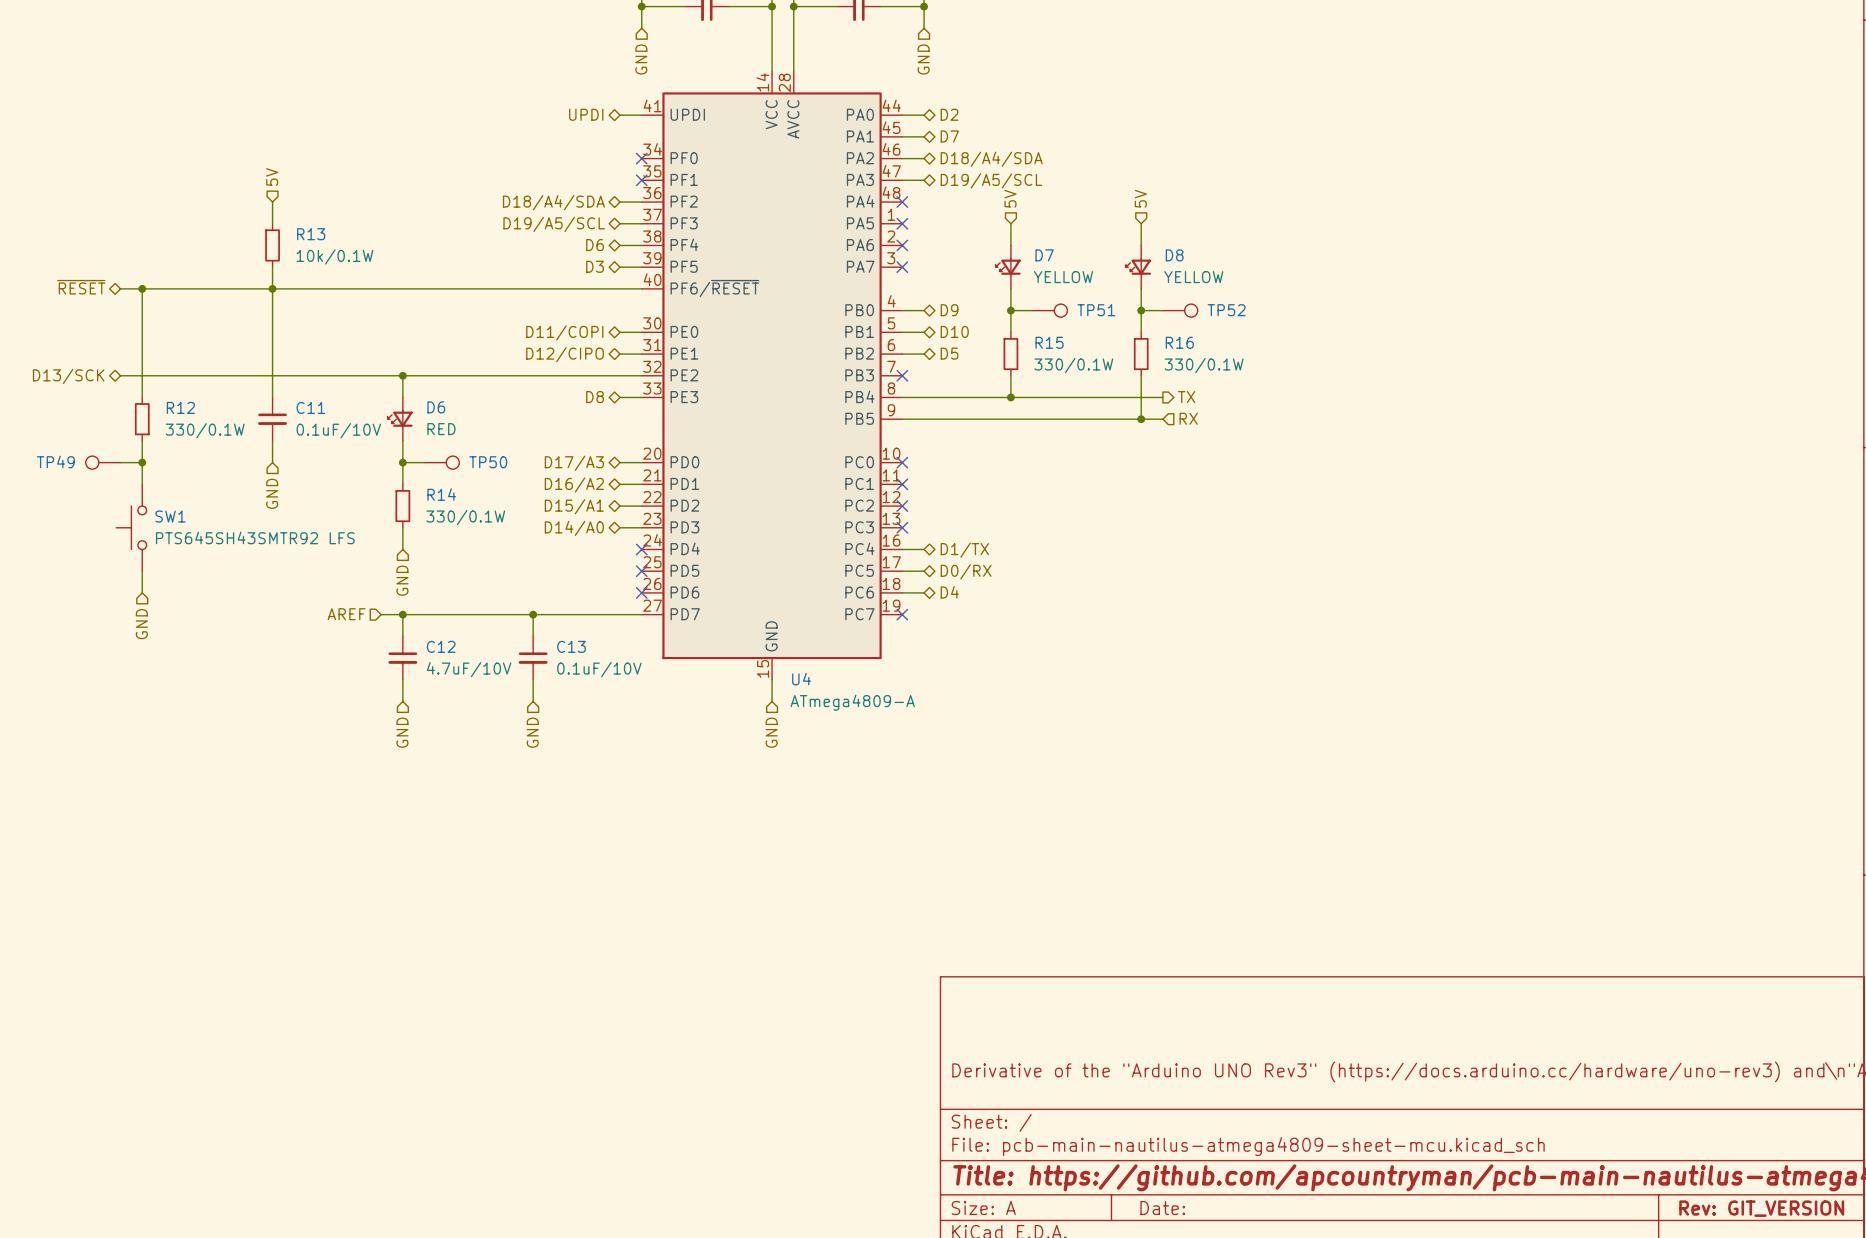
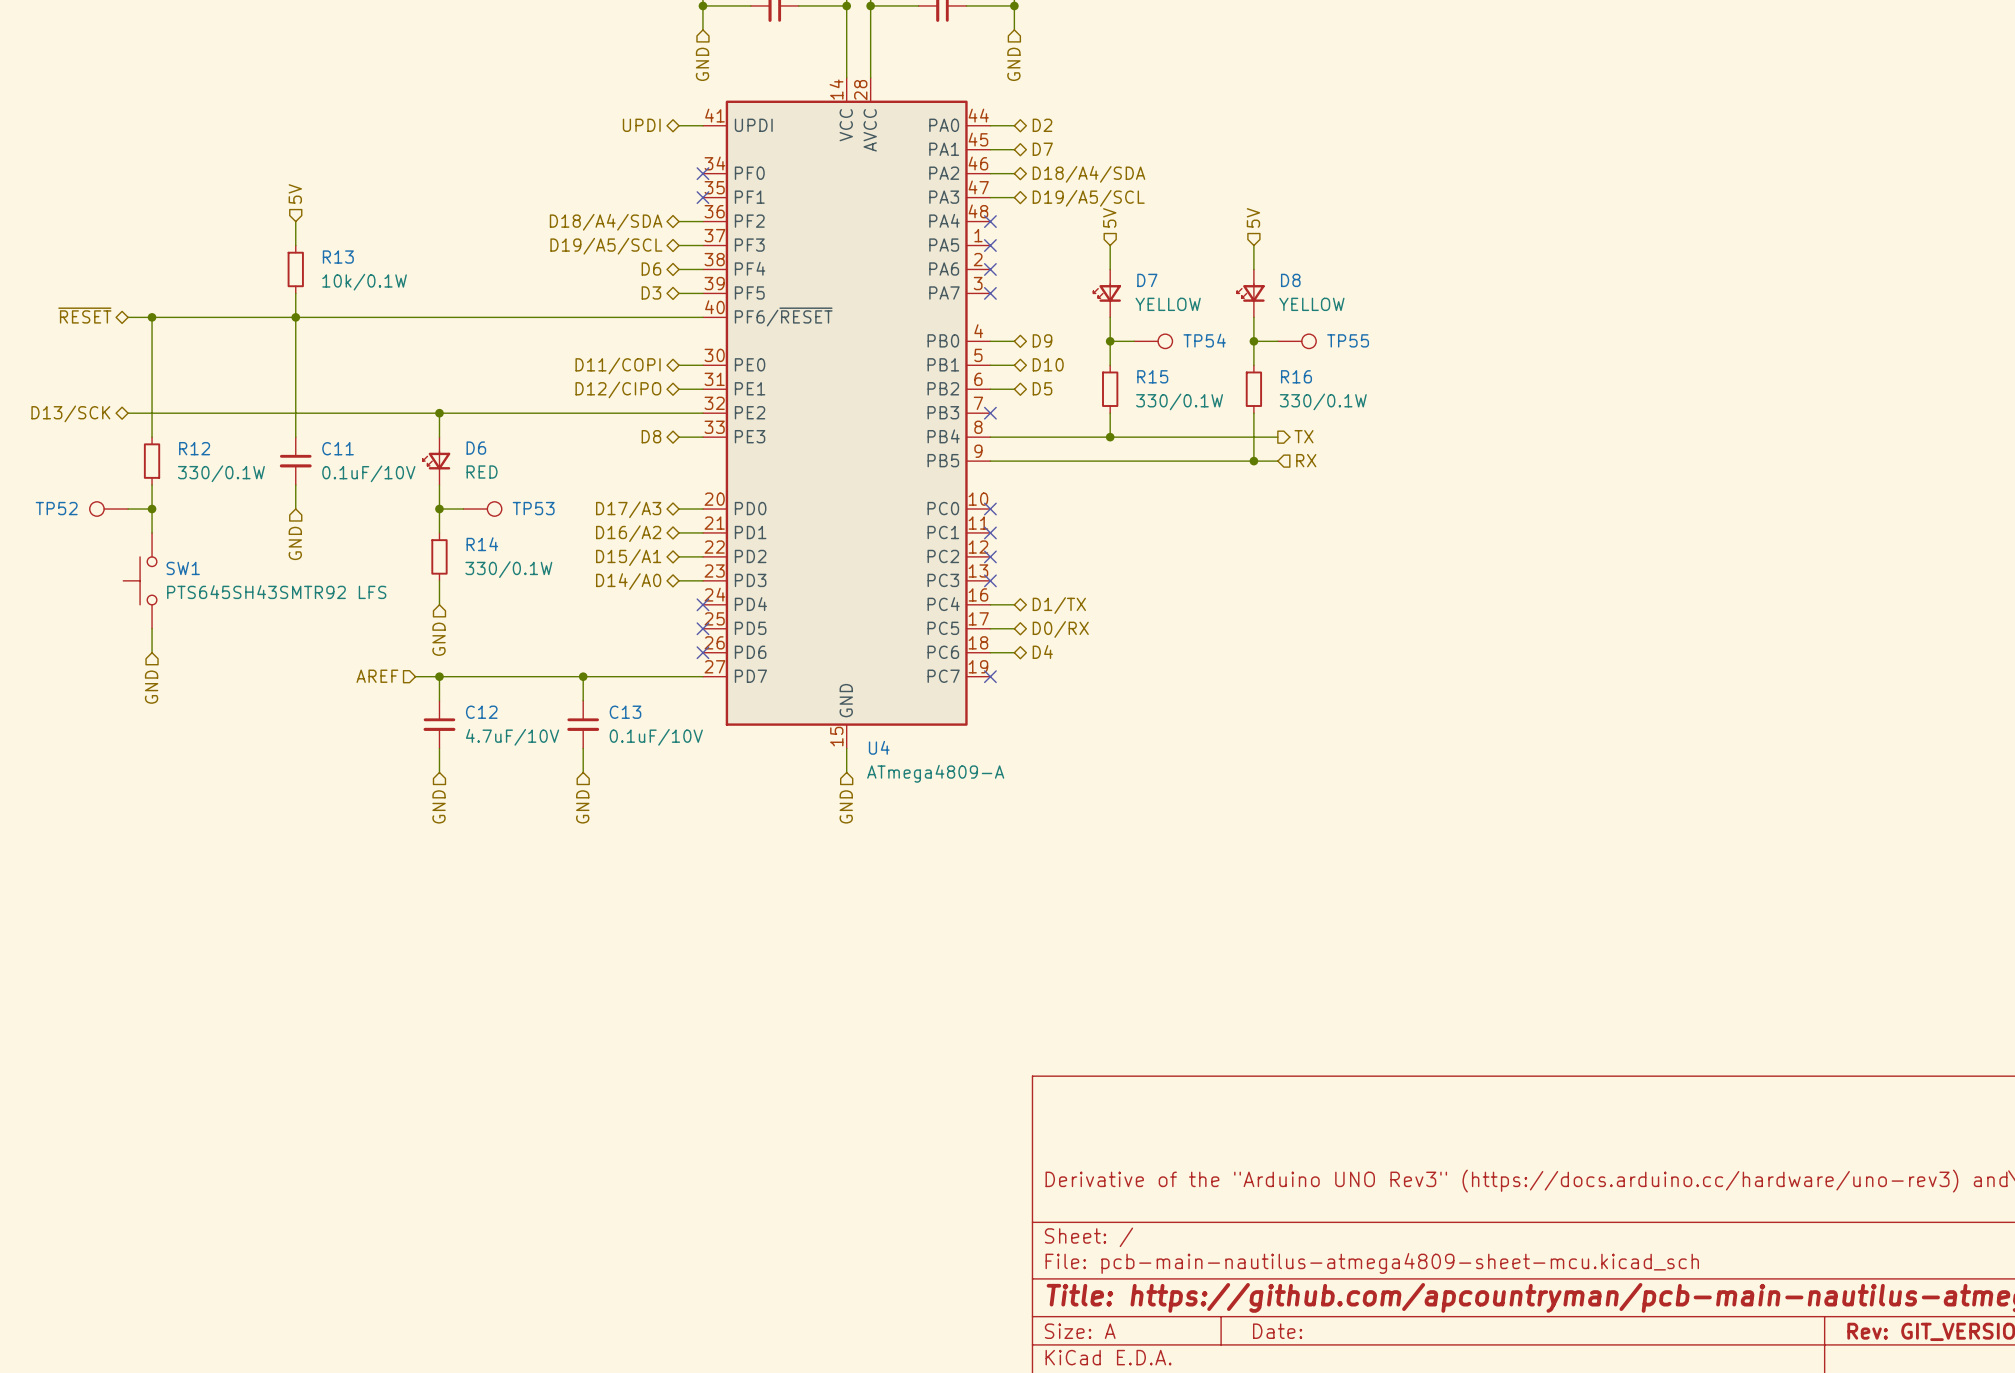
TP51 name: TP51 (1096, 310) -> TP54 (1204, 340)
TP52 name: TP52 (1226, 310) -> TP55 (1348, 340)
TP49 name: TP49 (55, 461) -> TP52 (56, 508)
TP50 name: TP50 (488, 462) -> TP53 (533, 508)

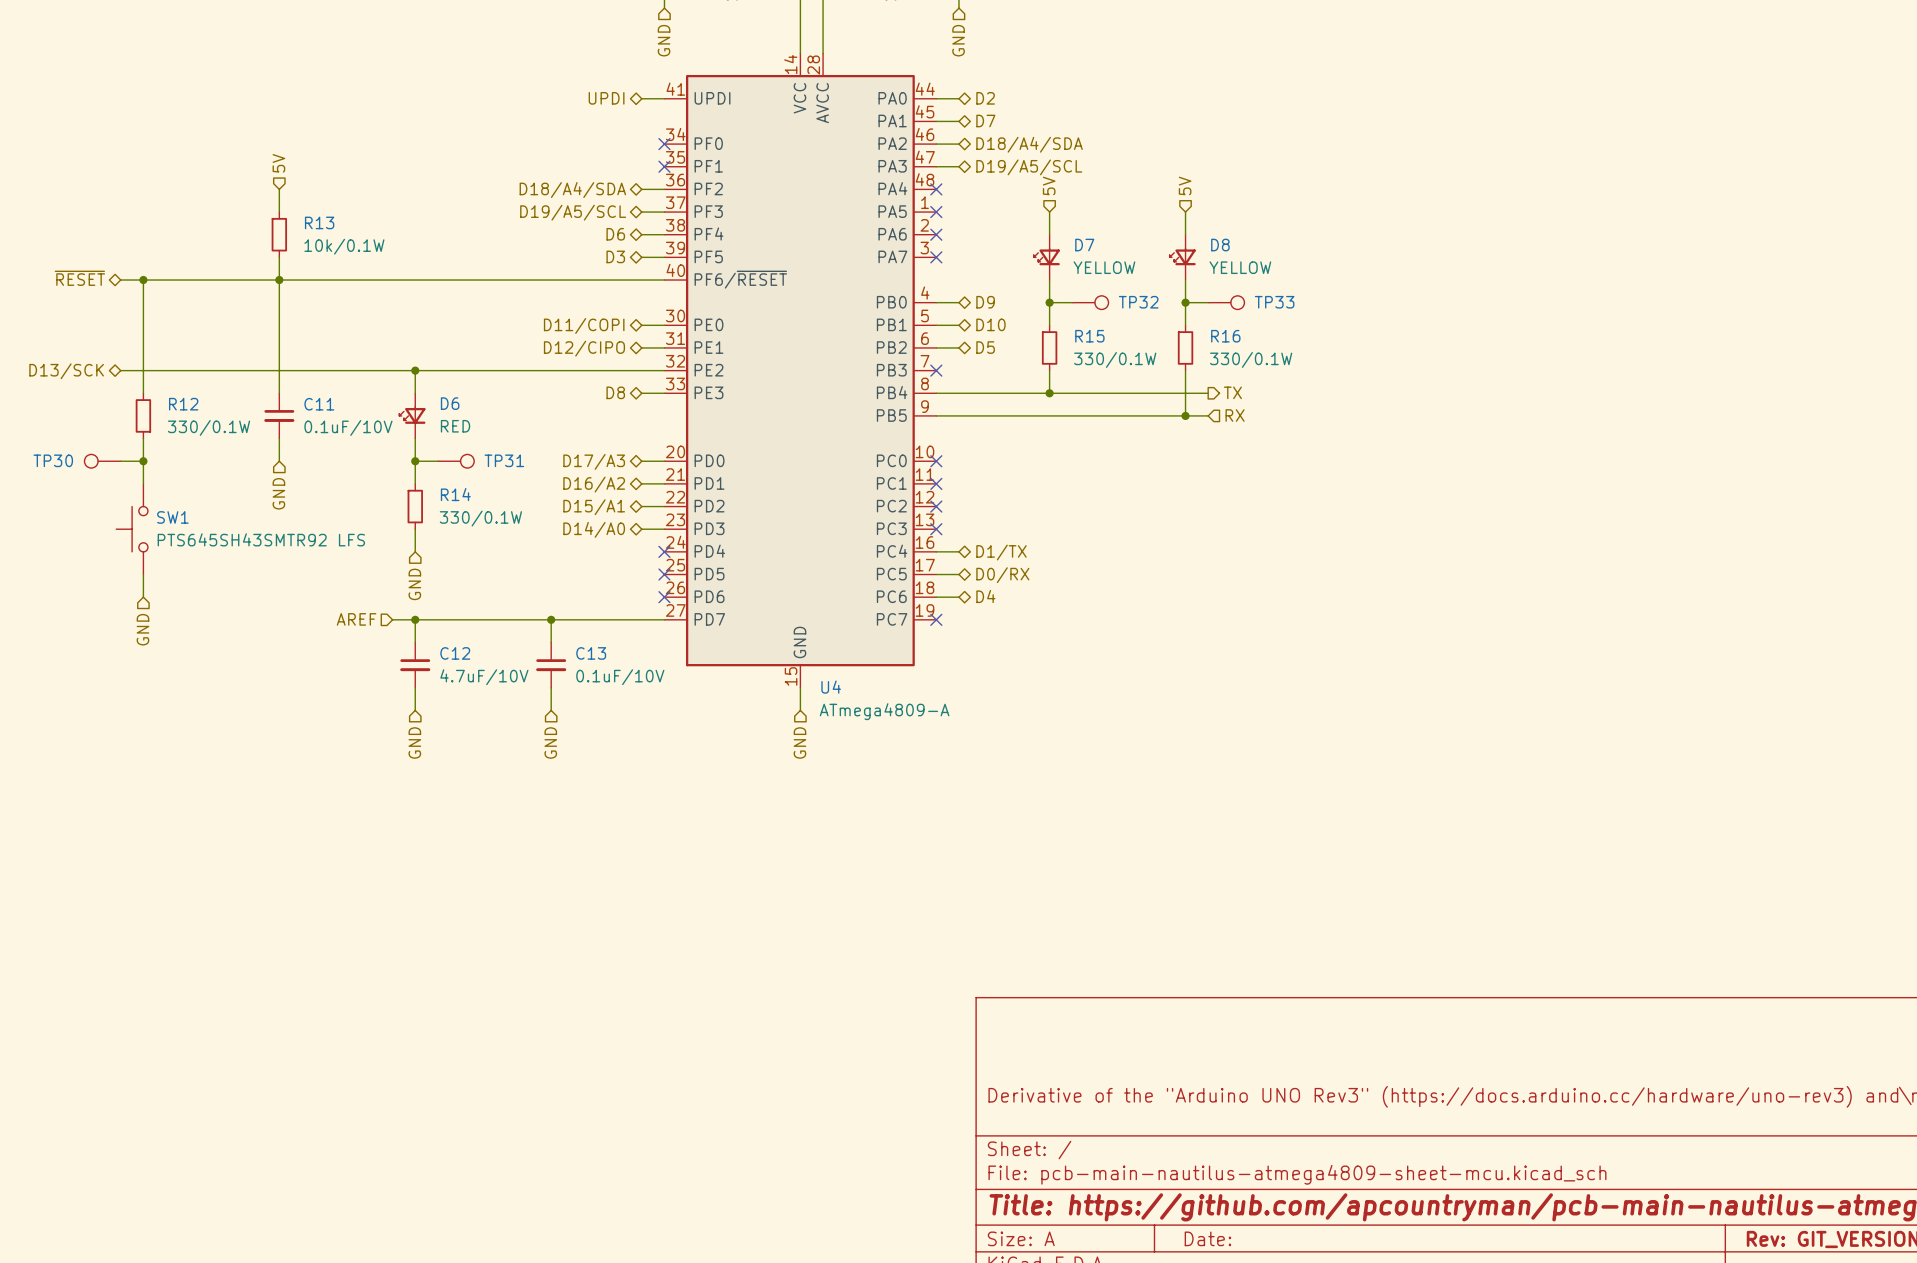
TP54 name: TP54 (1204, 340) -> TP32 (1138, 302)
TP55 name: TP55 (1348, 340) -> TP33 (1274, 302)
TP52 name: TP52 (56, 508) -> TP30 (53, 460)
TP53 name: TP53 (533, 508) -> TP31 (504, 460)

